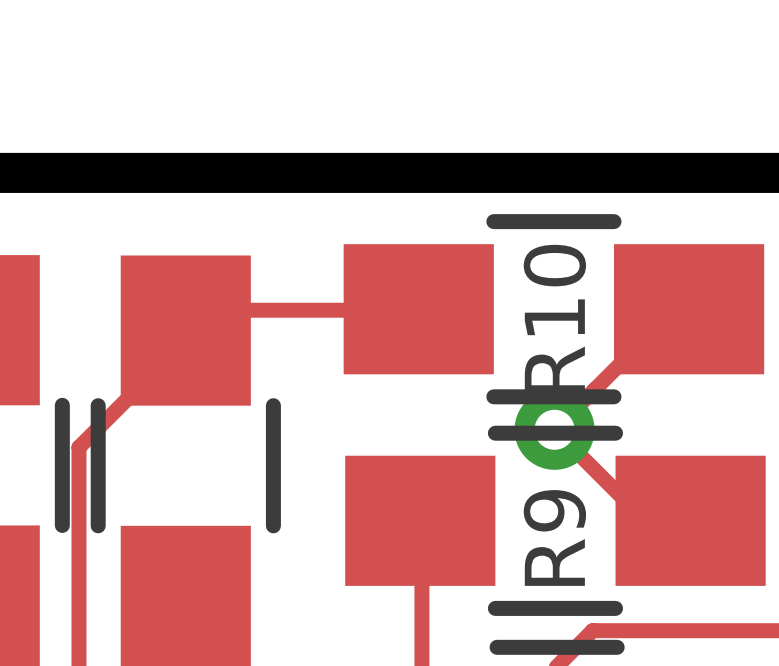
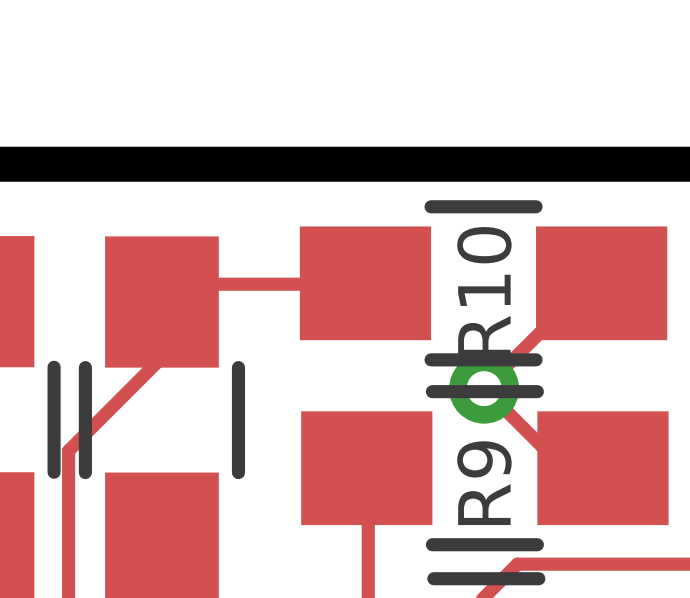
track: (185, 340) (78, 447) (78, 500) -> (161, 310) (161, 357) (68, 450)

